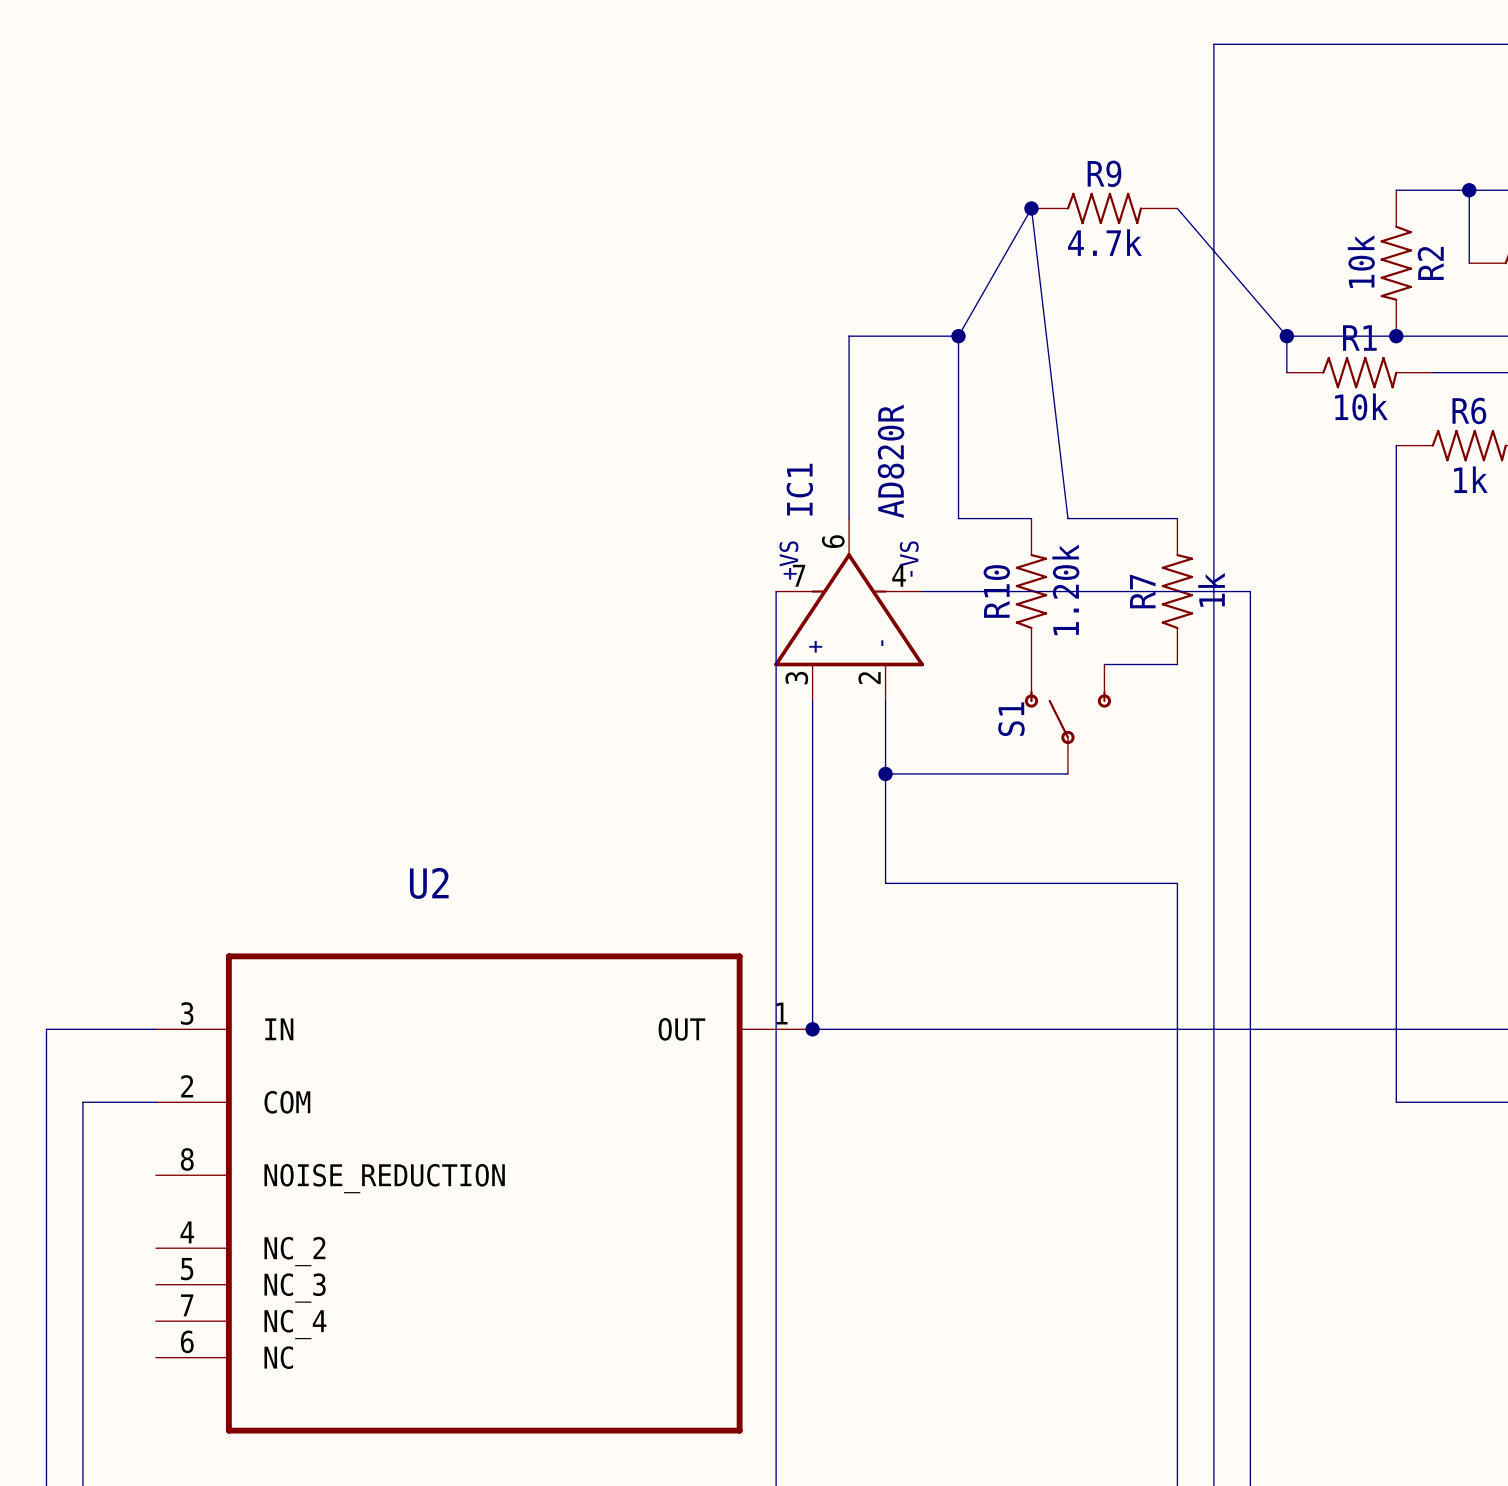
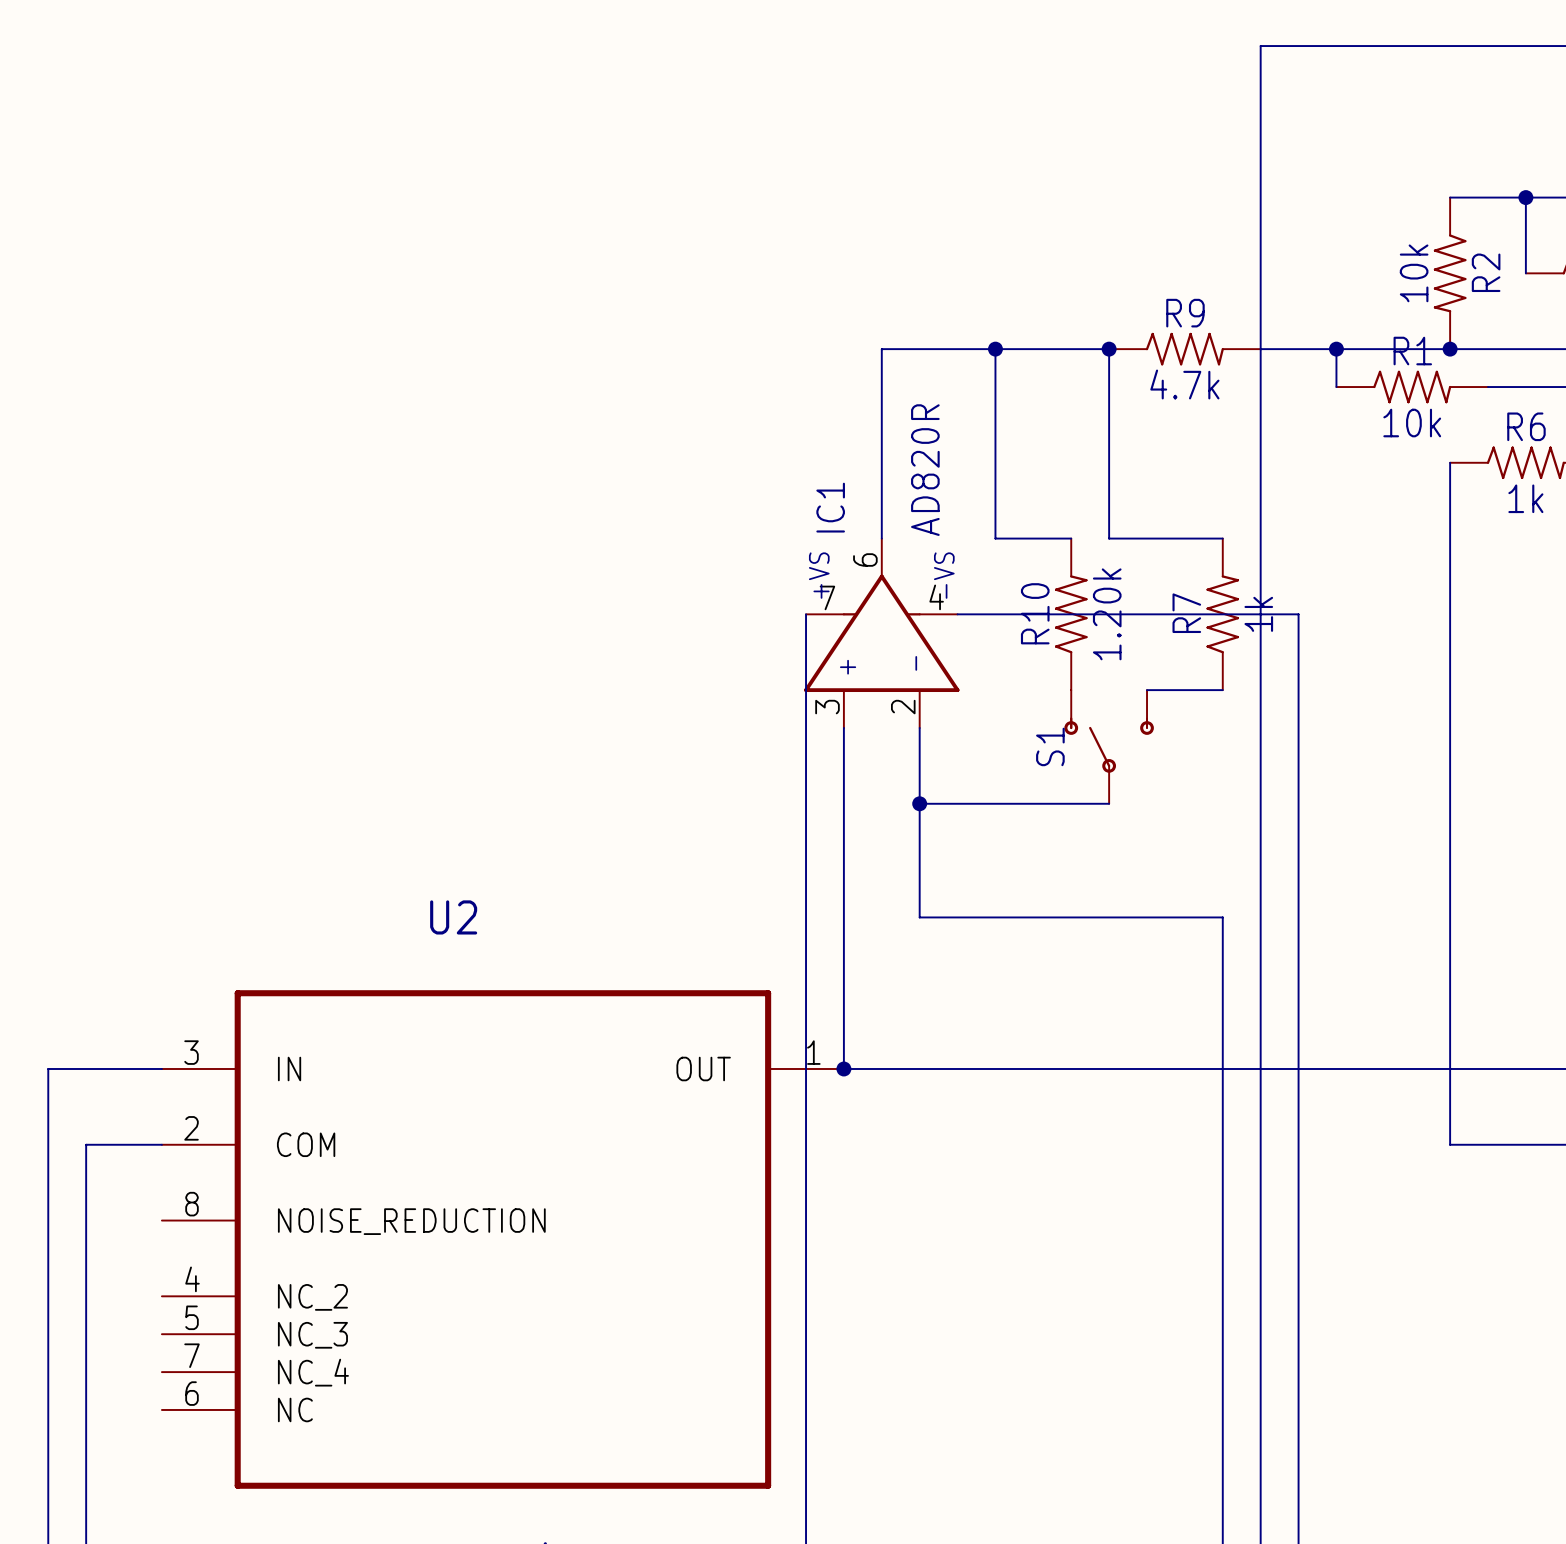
junction: (1031, 208) -> none
R9 position: (1104, 208) -> (1184, 349)
wire: (1177, 208) (1286, 336) -> (1260, 349) (1336, 349)
wire: (958, 336) (1031, 208) (1067, 518) -> (995, 349) (1109, 349) (1109, 538)
junction: none -> (1109, 349)

